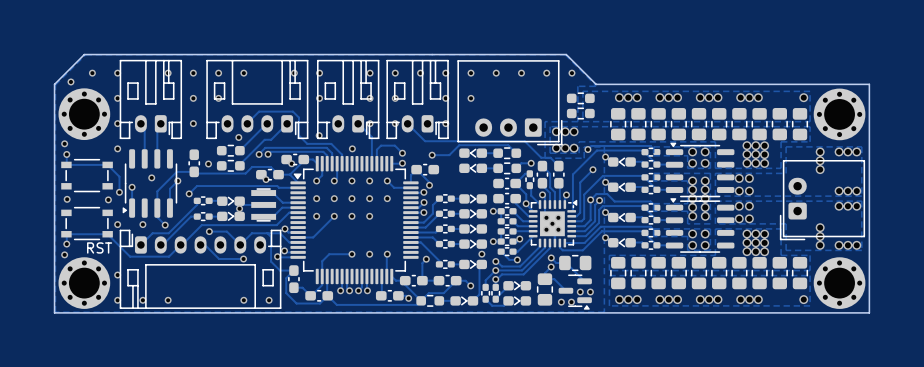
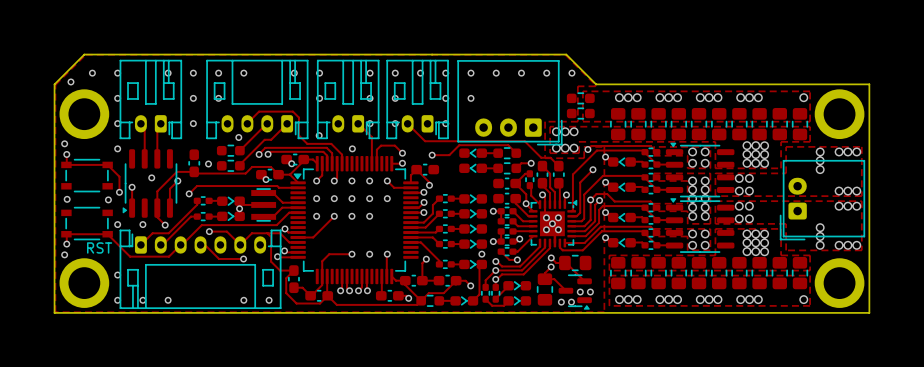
part footprint: [58, 88, 111, 141] -> [59, 89, 110, 140]
part footprint: [813, 88, 866, 141] -> [814, 89, 865, 140]
part footprint: [58, 257, 111, 309] -> [59, 258, 110, 308]
part footprint: [813, 257, 866, 309] -> [814, 258, 865, 308]

